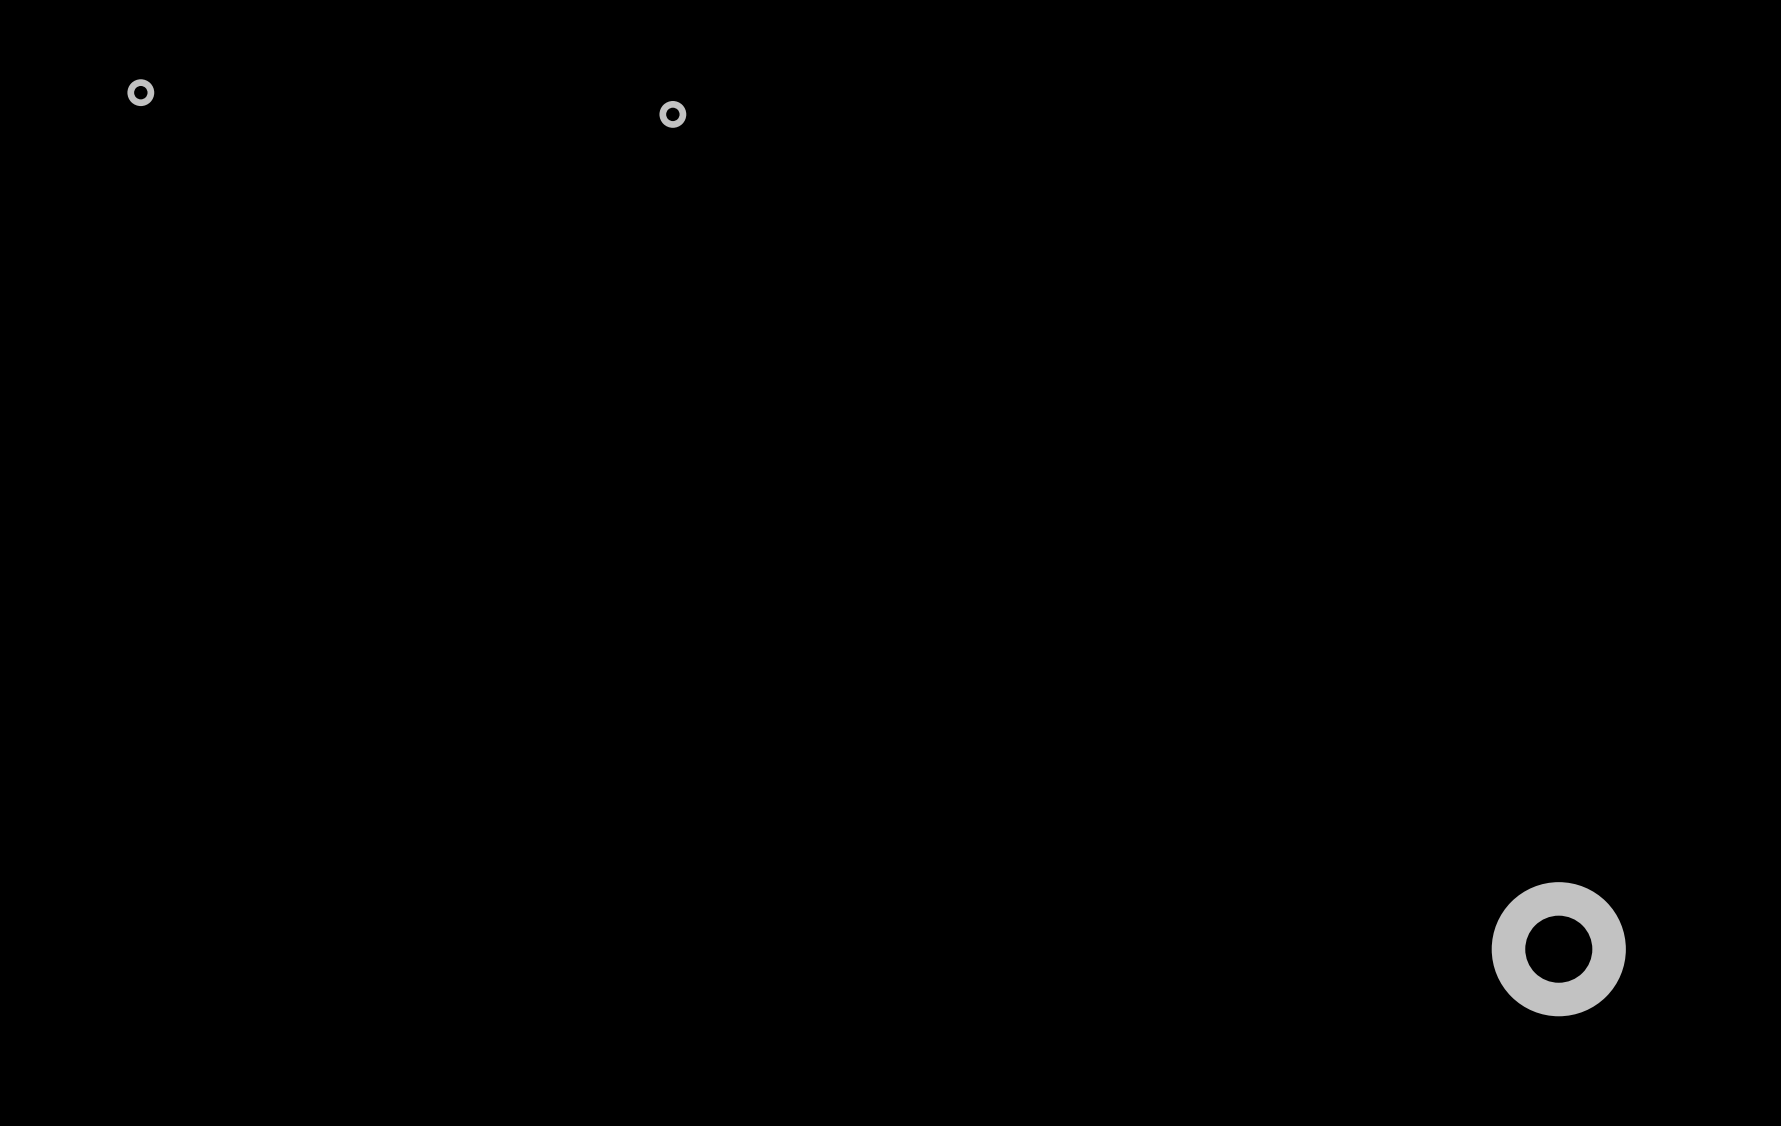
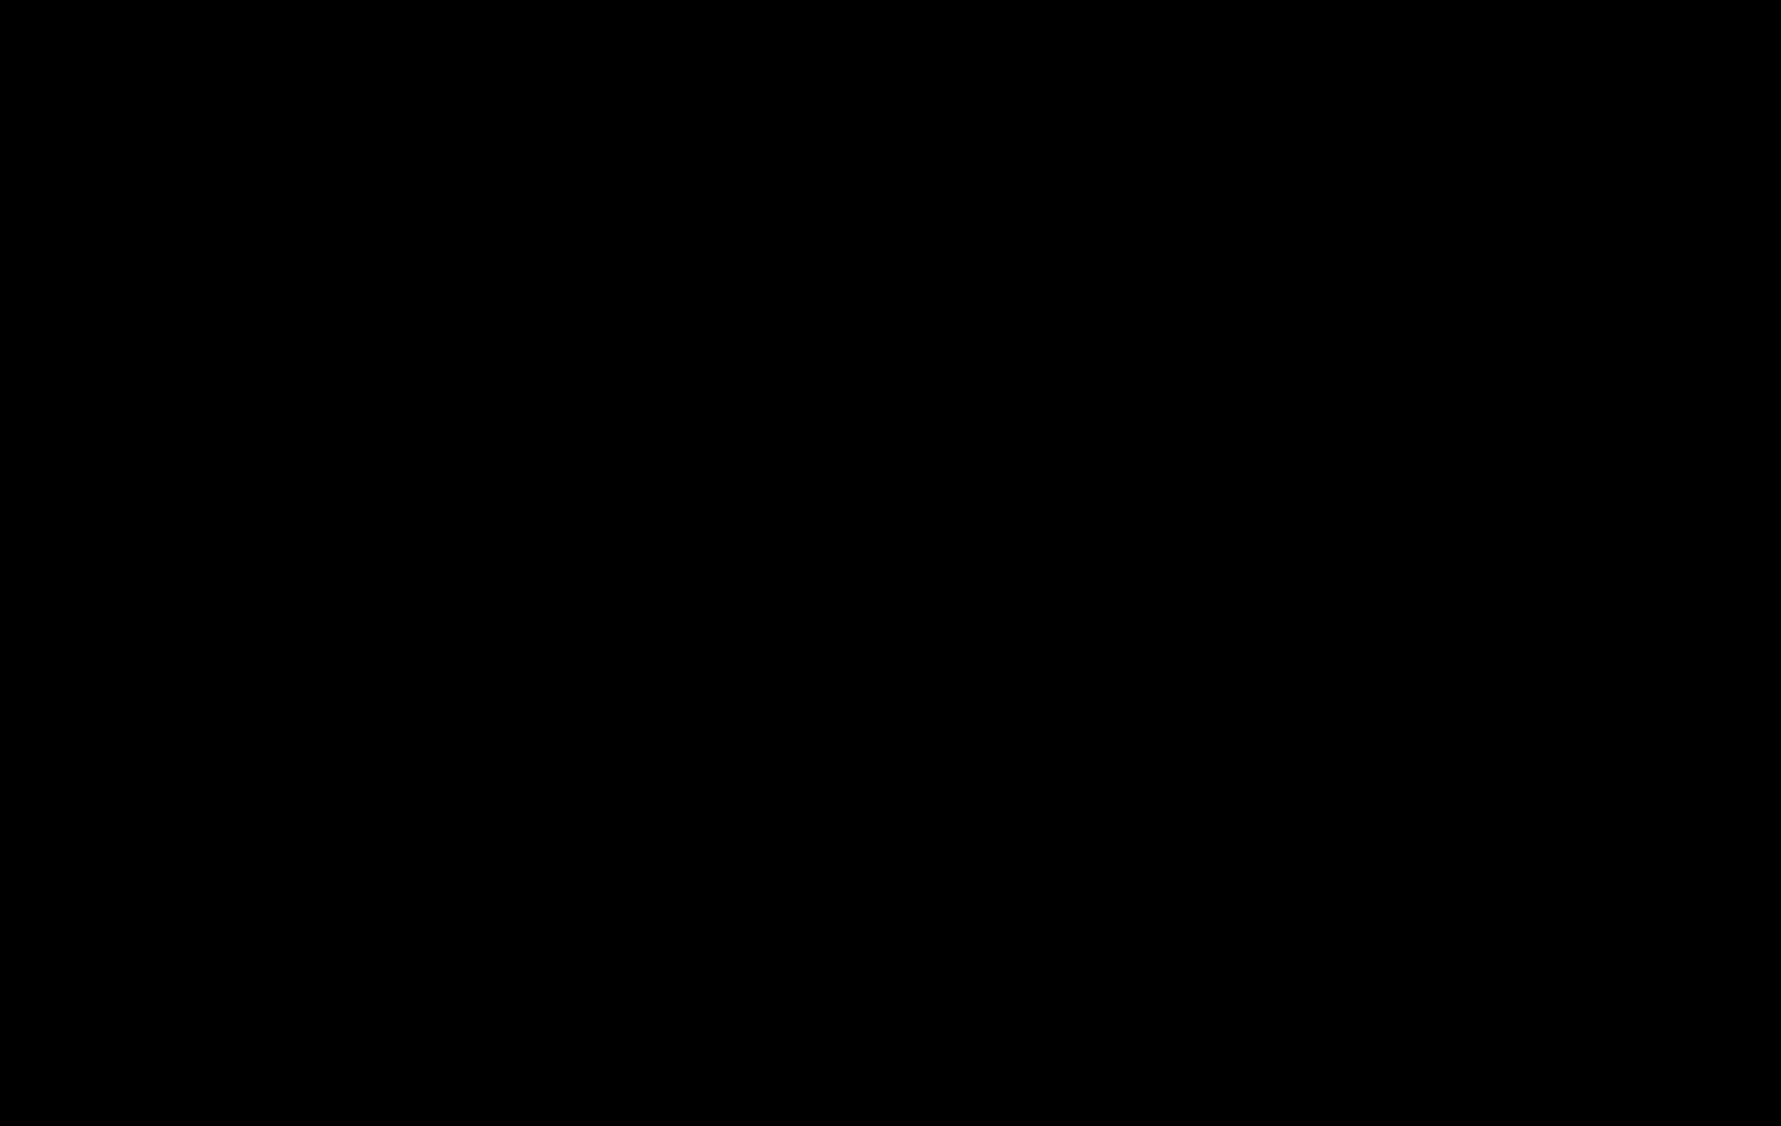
via: (140, 92) -> none
via: (672, 114) -> none
via: (1558, 949) -> none

